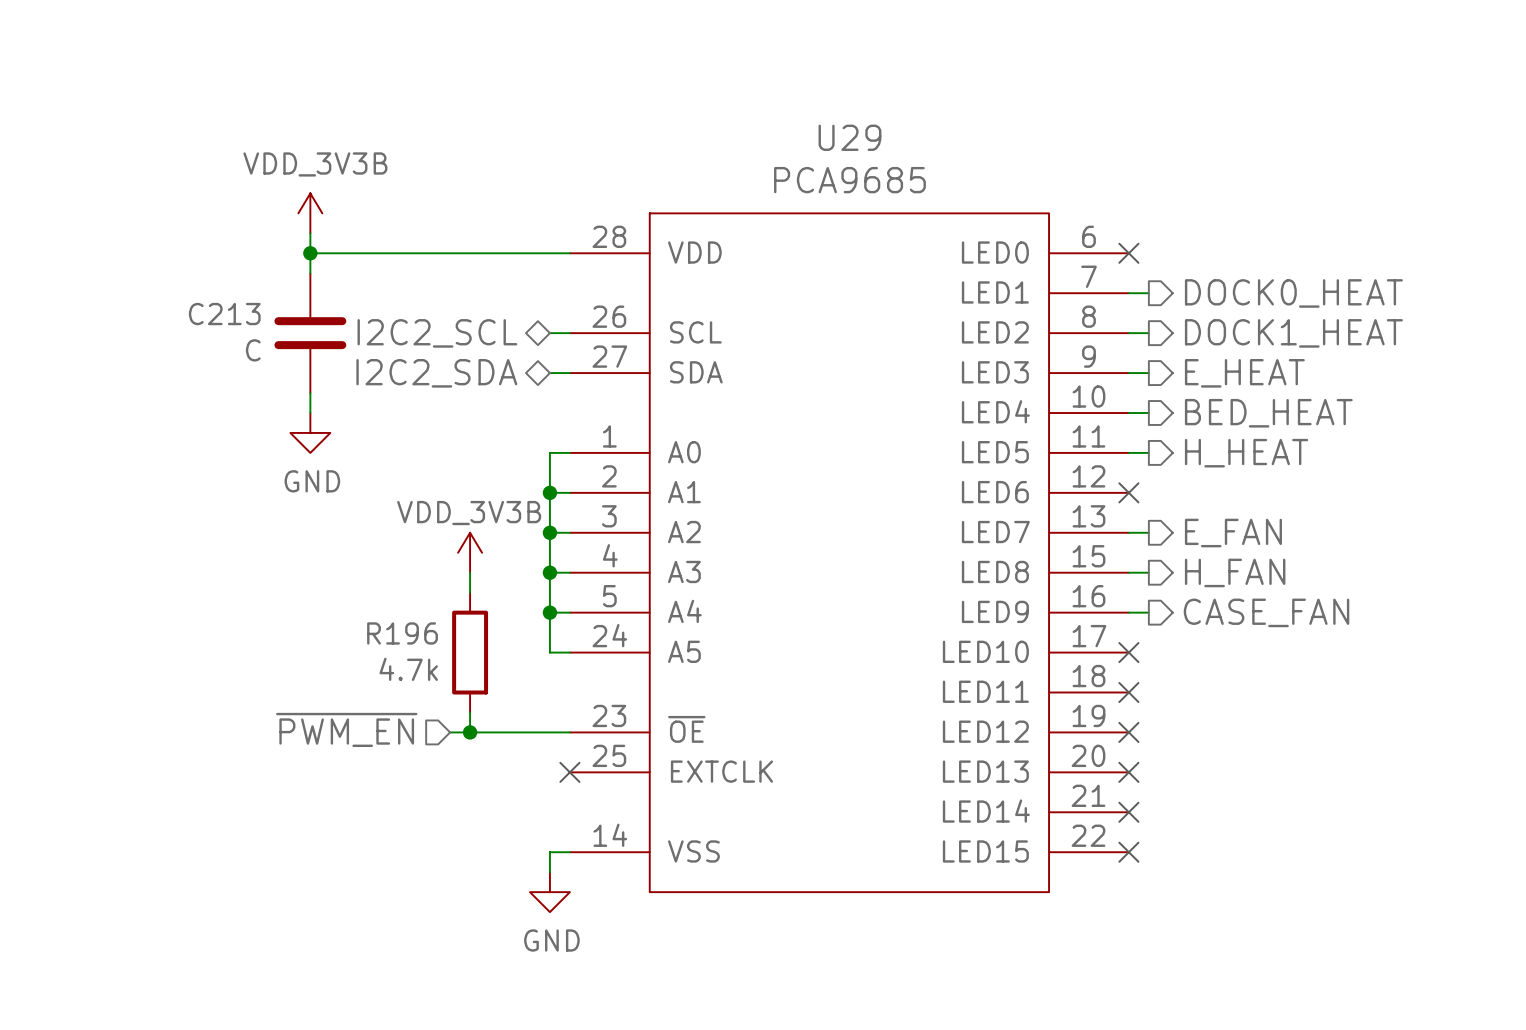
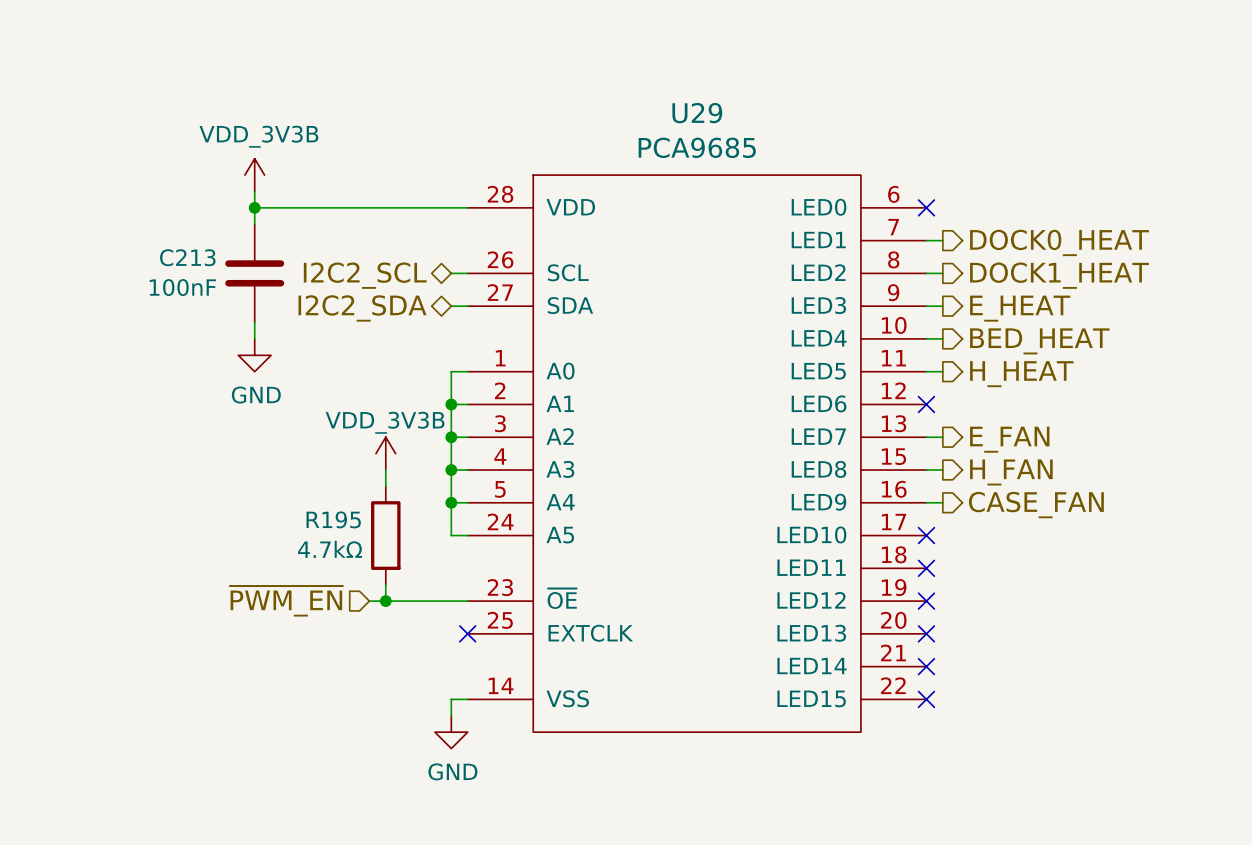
C213 value: C (253, 350) -> 100nF (182, 287)
R196 name: R196 (402, 633) -> R195 (333, 519)
R196 value: 4.7k (408, 669) -> 4.7kΩ (330, 549)

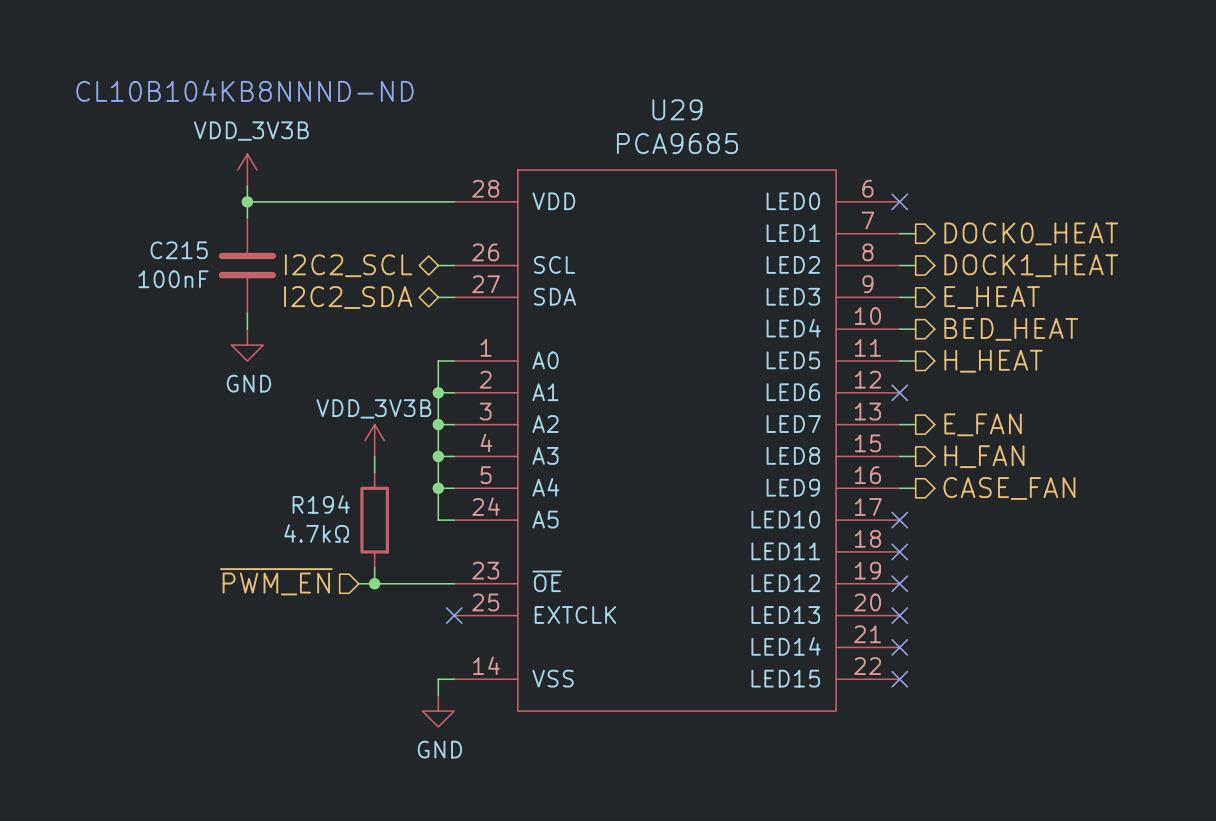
text: none -> CL10B104KB8NNND-ND (244, 90)
C213 name: C213 (187, 257) -> C215 (179, 250)
R195 name: R195 (333, 519) -> R194 (321, 504)

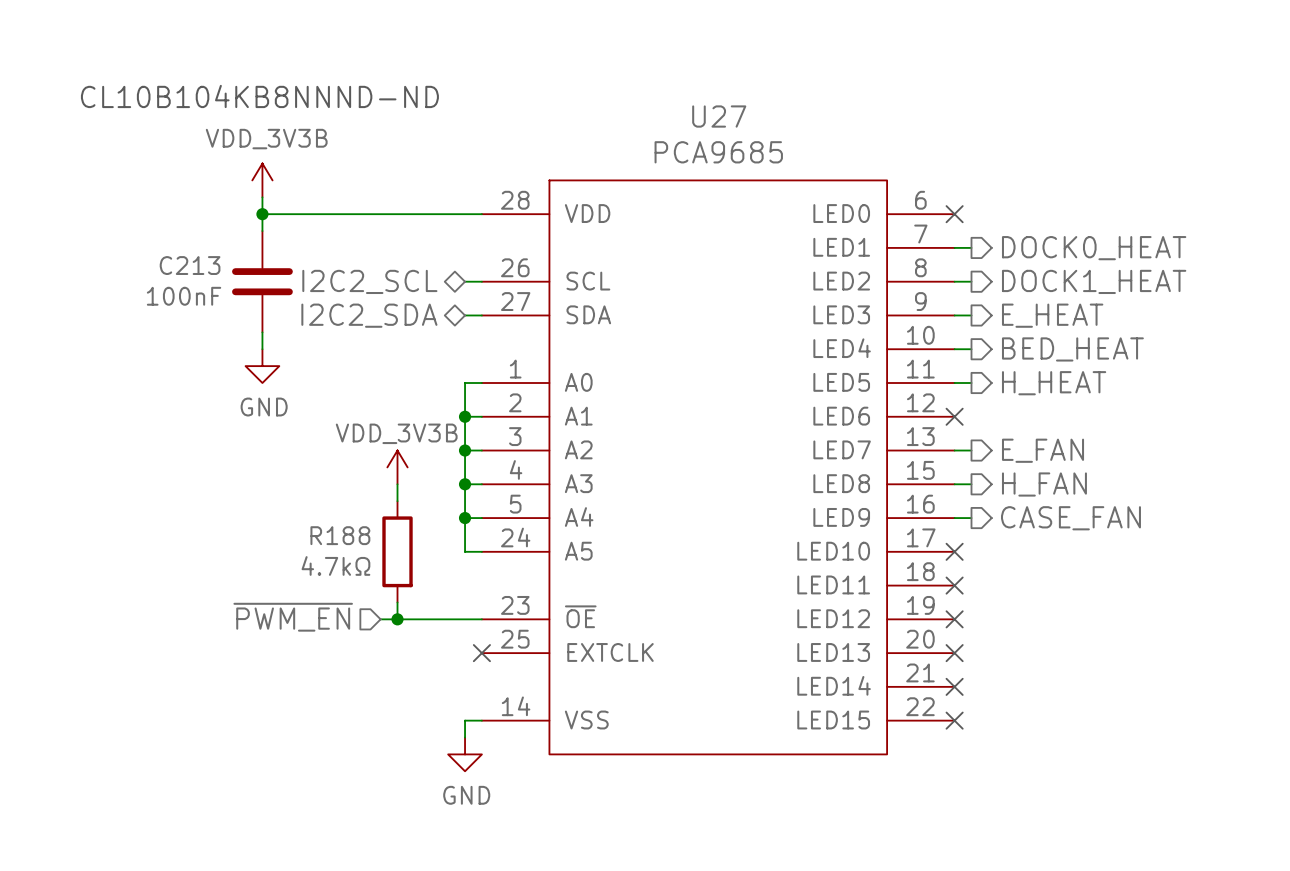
U29 name: U29 (677, 109) -> U27 (719, 116)
C215 name: C215 (179, 250) -> C213 (190, 265)
R194 name: R194 (321, 504) -> R188 (340, 535)

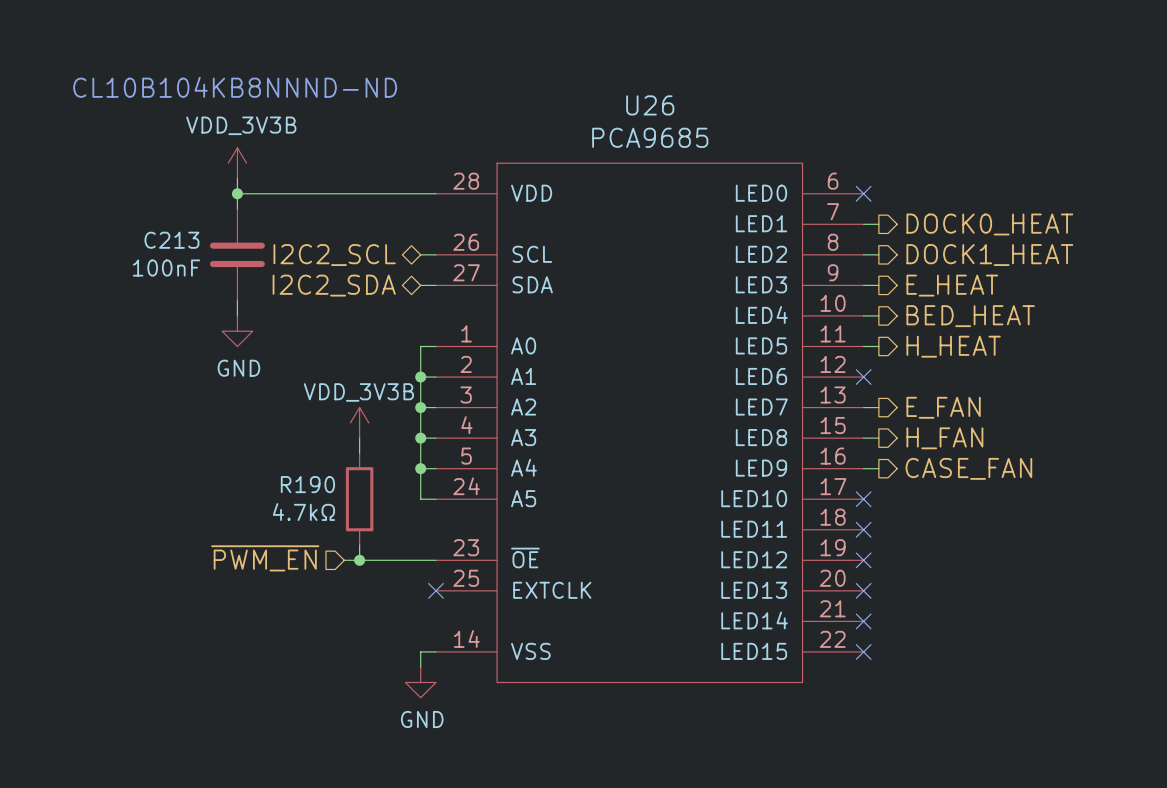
U27 name: U27 (719, 116) -> U26 (650, 105)
R188 name: R188 (340, 535) -> R190 (307, 484)

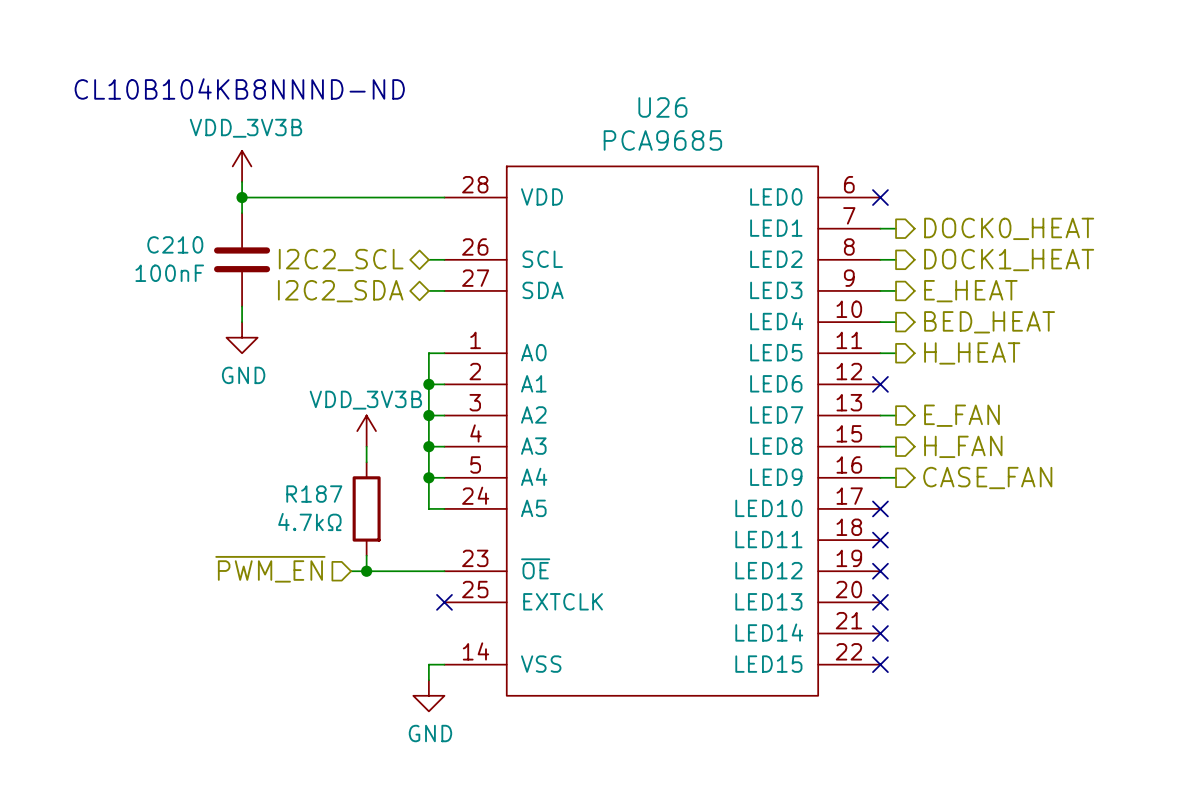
C213 name: C213 (171, 240) -> C210 (175, 244)
R190 name: R190 (307, 484) -> R187 (314, 494)

